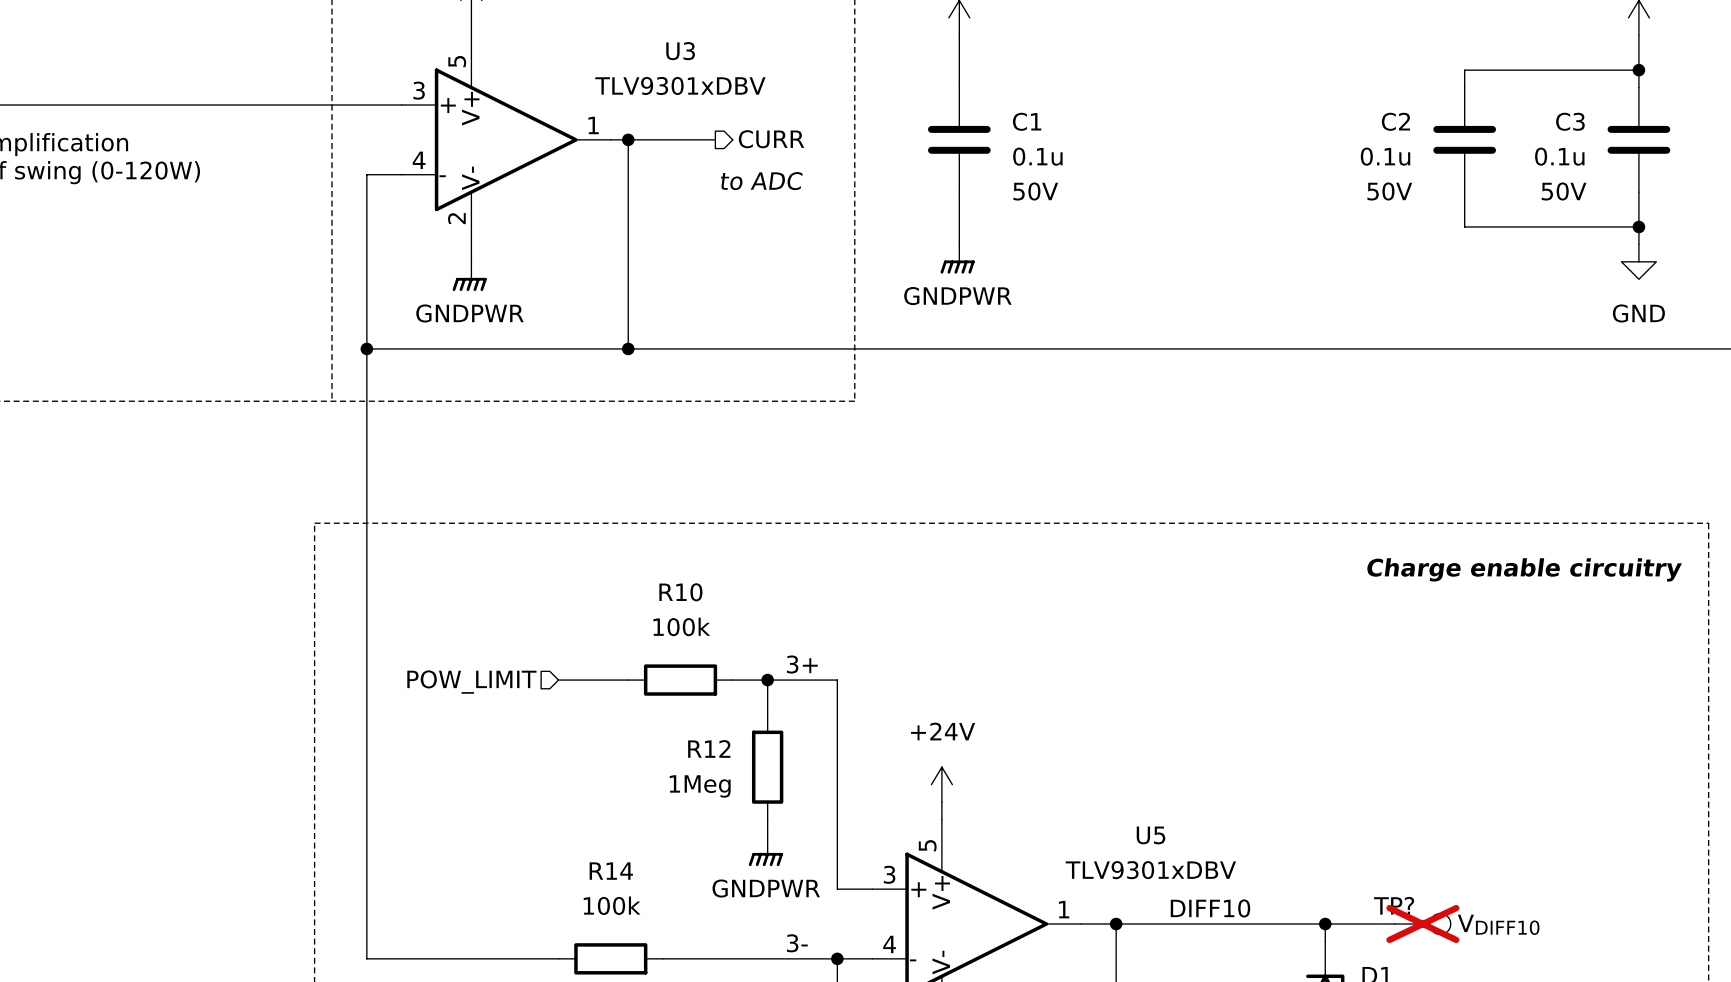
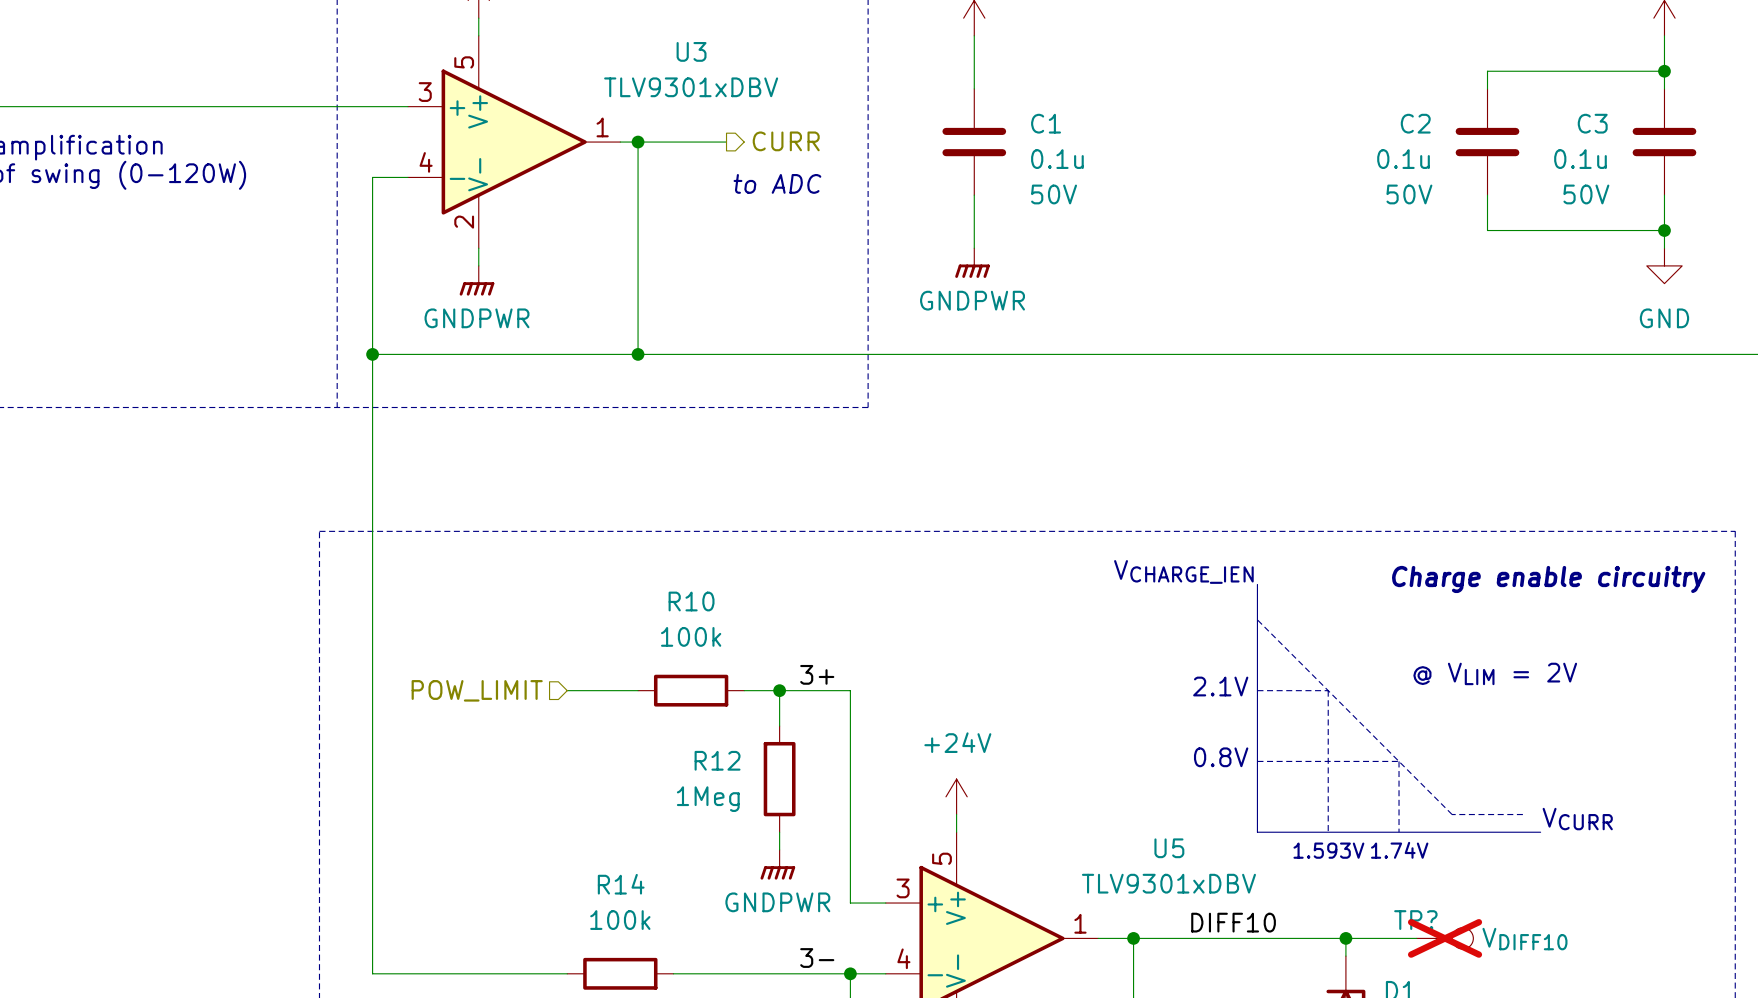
text: none -> VCHARGE_IEN (1183, 571)
line: none -> (1257, 584) (1257, 832) (1540, 832)
line: none -> (1257, 619) (1452, 814) (1522, 814)
text: none -> @ VLIM = 2V (1495, 673)
text: none -> 2.1V (1220, 686)
line: none -> (1257, 690) (1328, 690) (1328, 832)
text: none -> 0.8V (1221, 757)
line: none -> (1257, 761) (1399, 761) (1399, 832)
text: none -> VCURR (1577, 819)
text: none -> 1.593V (1328, 850)
text: none -> 1.74V (1399, 850)

